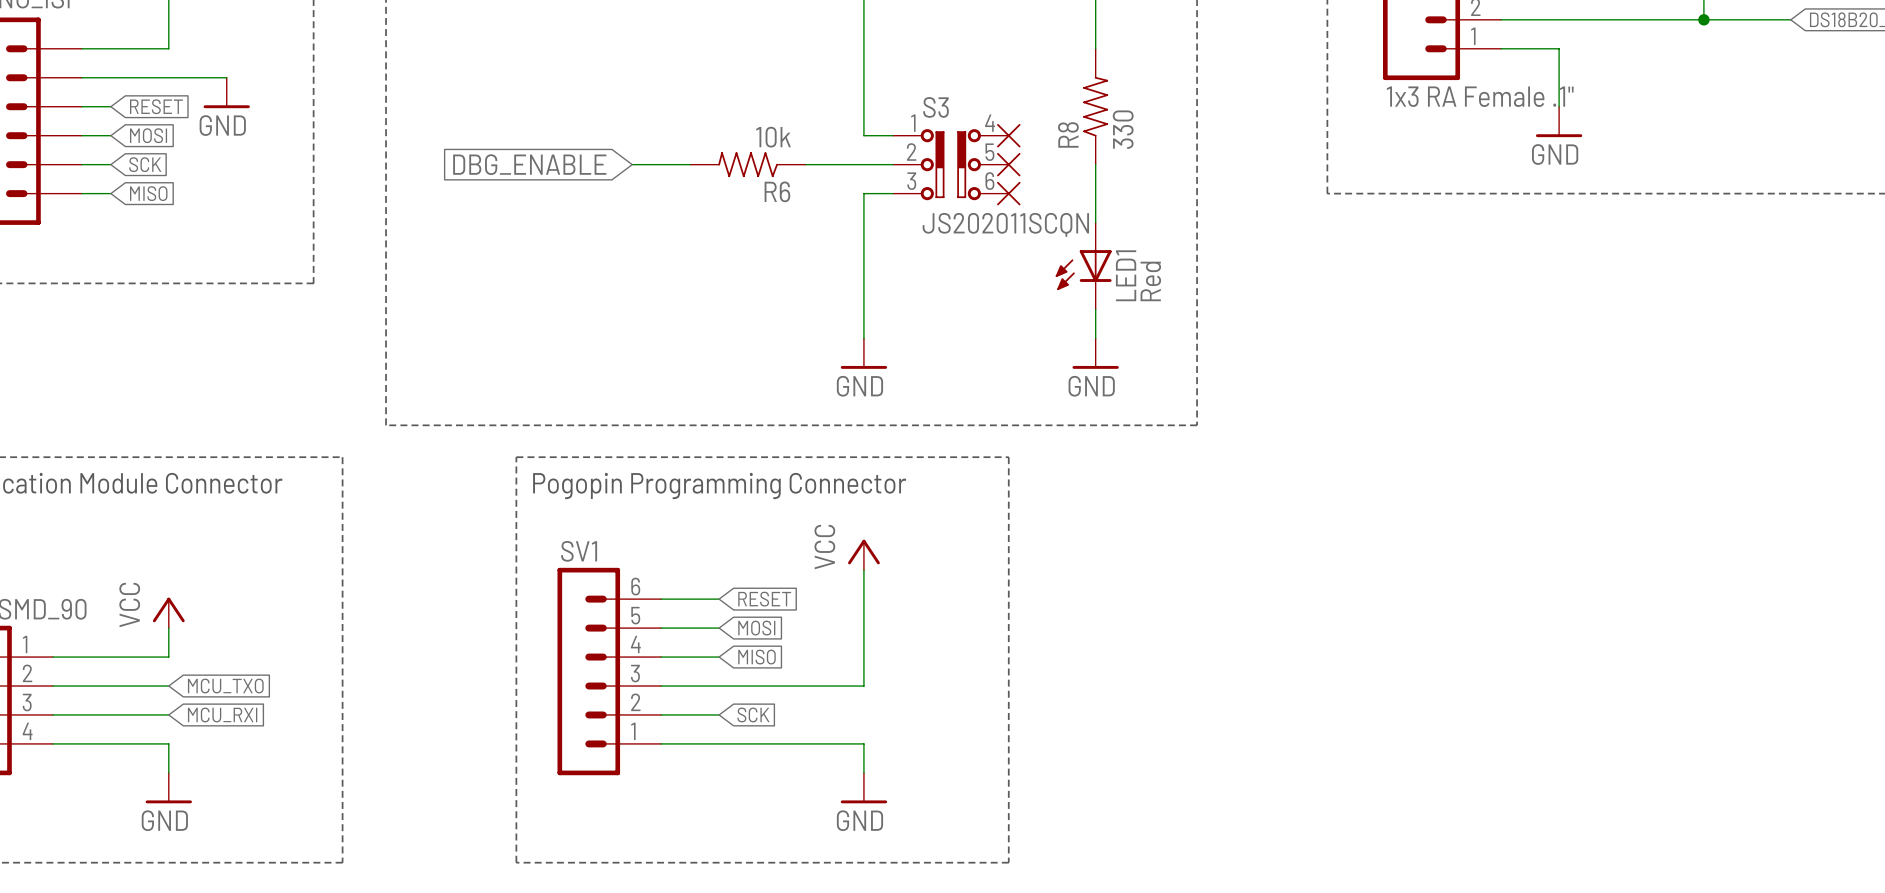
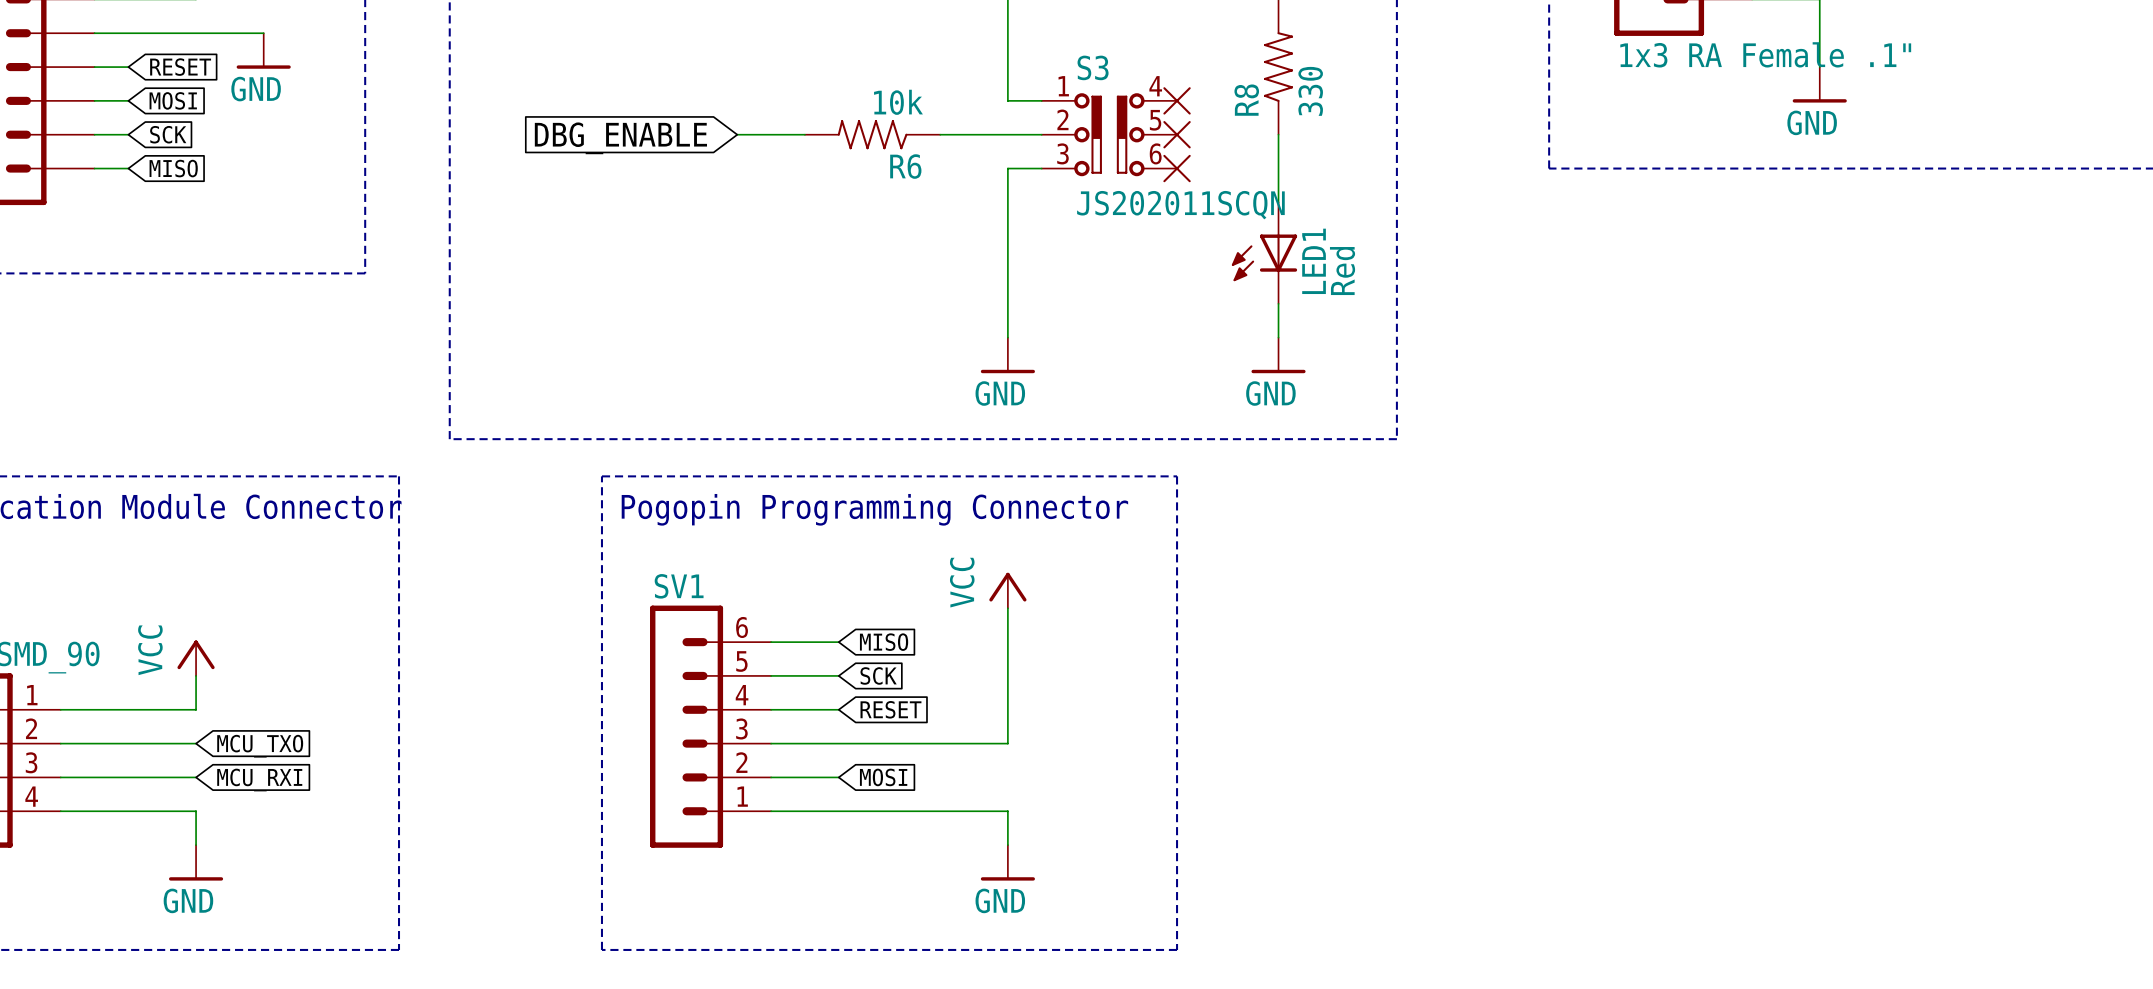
global label: RESET (764, 599) -> MISO (884, 642)
global label: MOSI (756, 628) -> SCK (878, 675)
global label: MISO (756, 657) -> RESET (890, 709)
global label: SCK (753, 714) -> MOSI (883, 777)

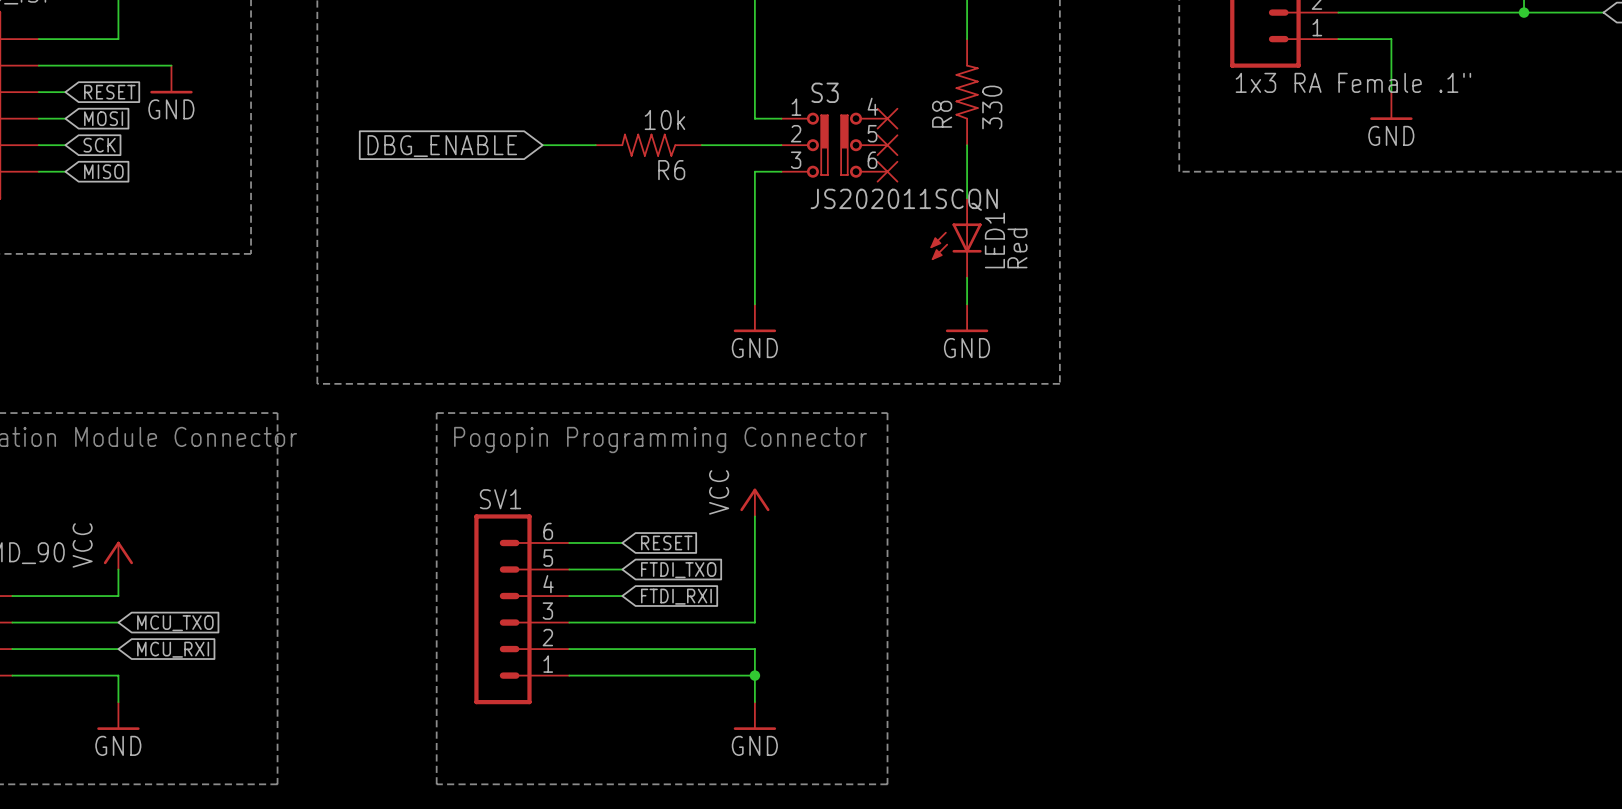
global label: MISO (884, 642) -> RESET (666, 542)
global label: SCK (878, 675) -> FTDI_TXO (678, 570)
global label: RESET (890, 709) -> FTDI_RXI (676, 596)
wire: none -> (622, 649) (754, 649) (754, 675)
global label: MOSI (883, 777) -> none
junction: none -> (754, 675)

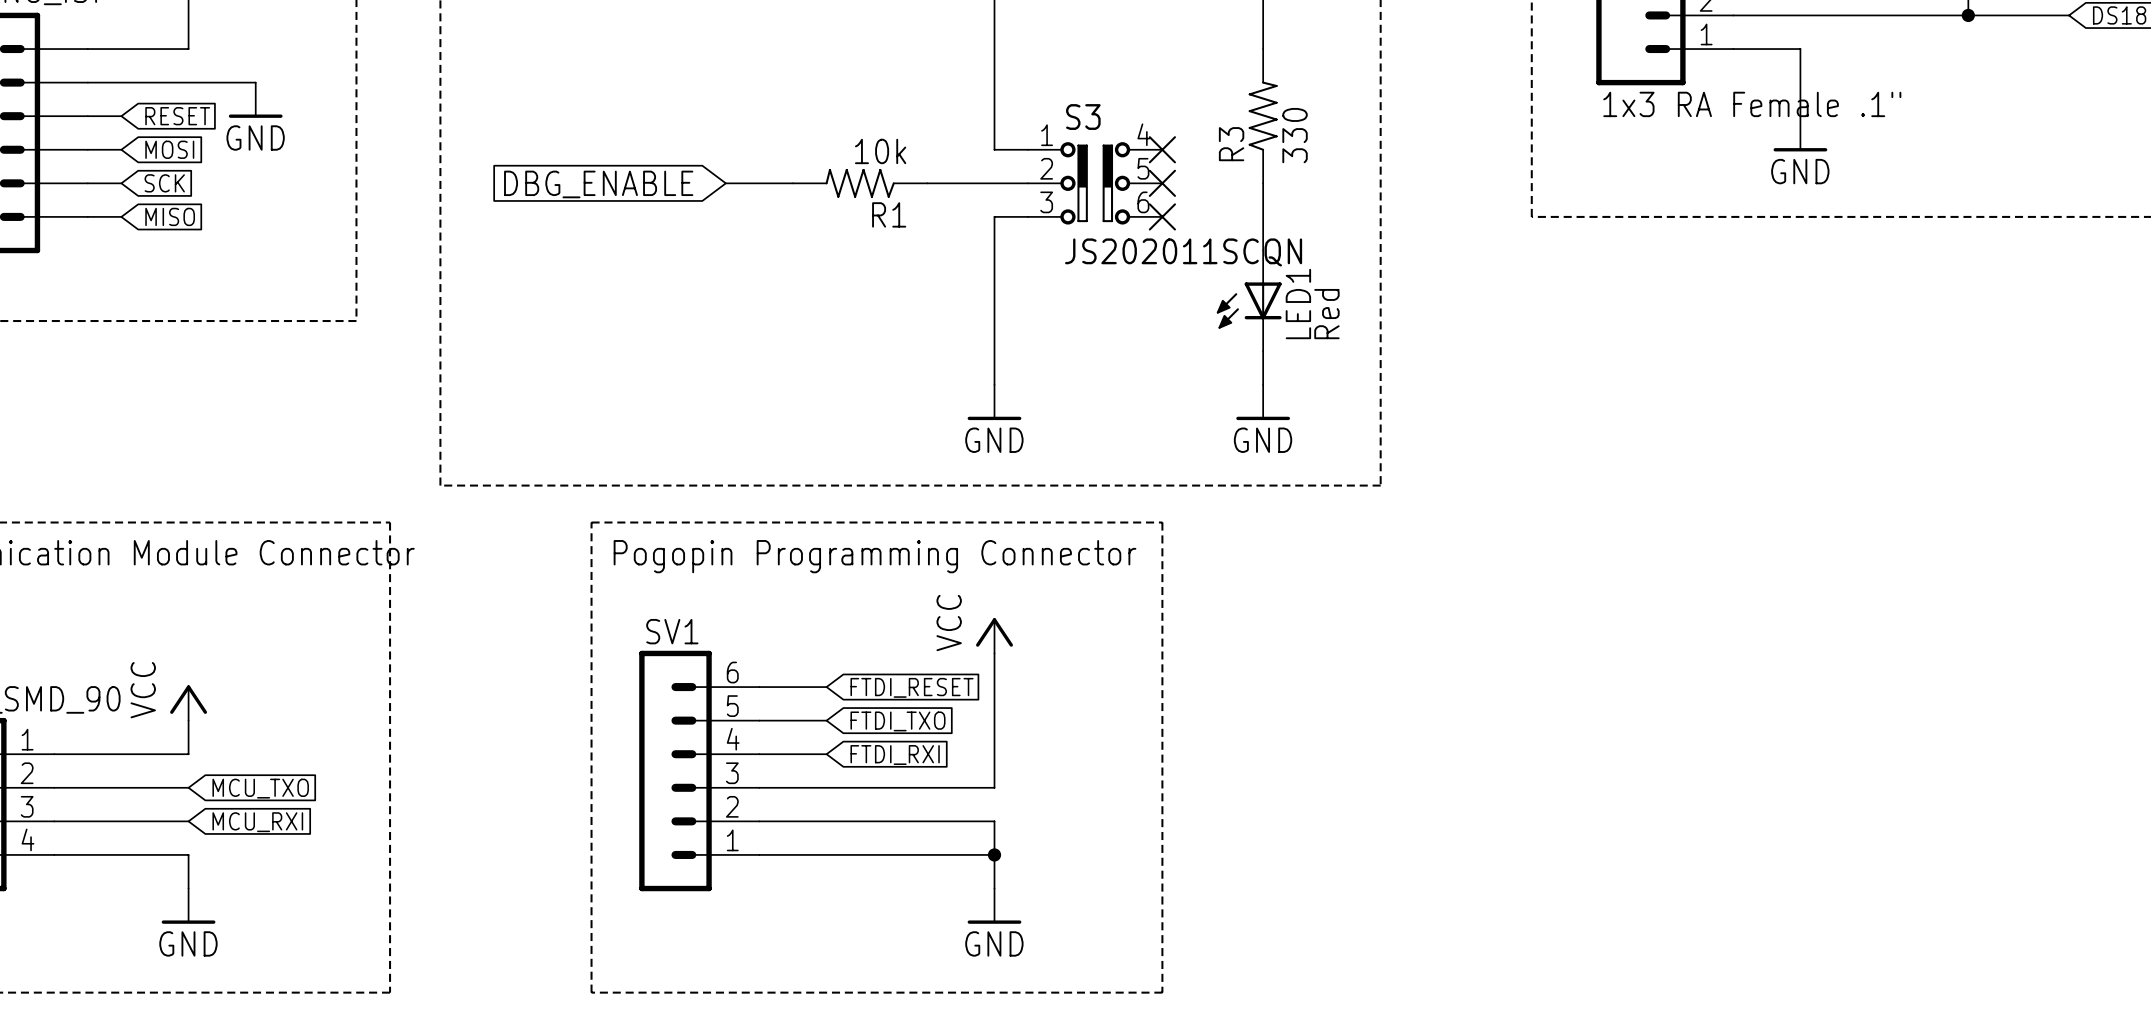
R8 name: R8 (942, 114) -> R3 (1231, 144)
R6 name: R6 (671, 170) -> R1 (889, 214)
global label: RESET (666, 542) -> FTDI_RESET (912, 687)

